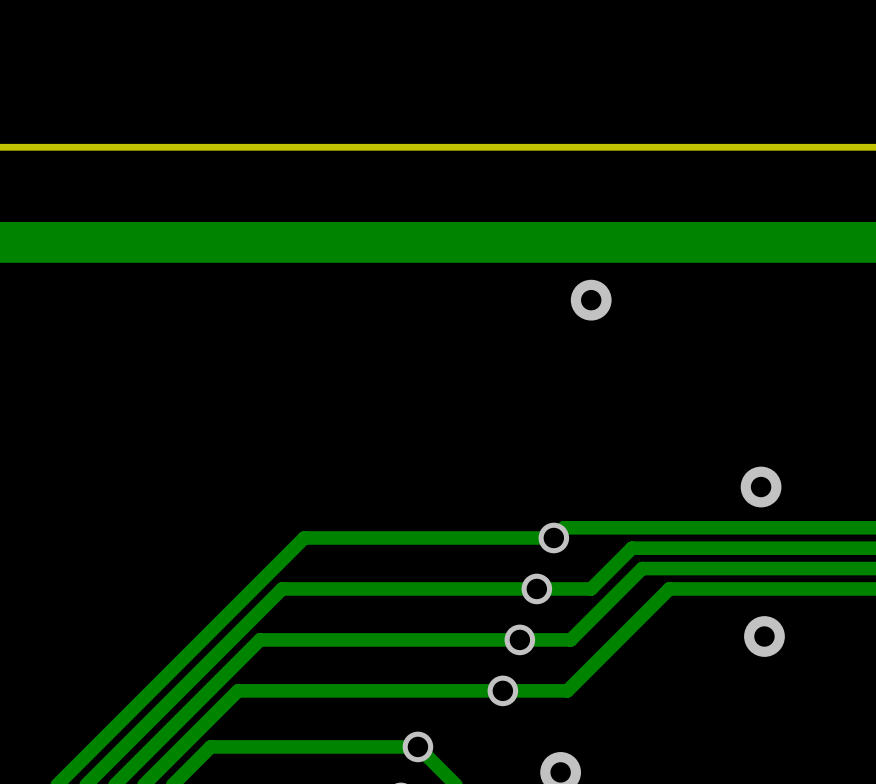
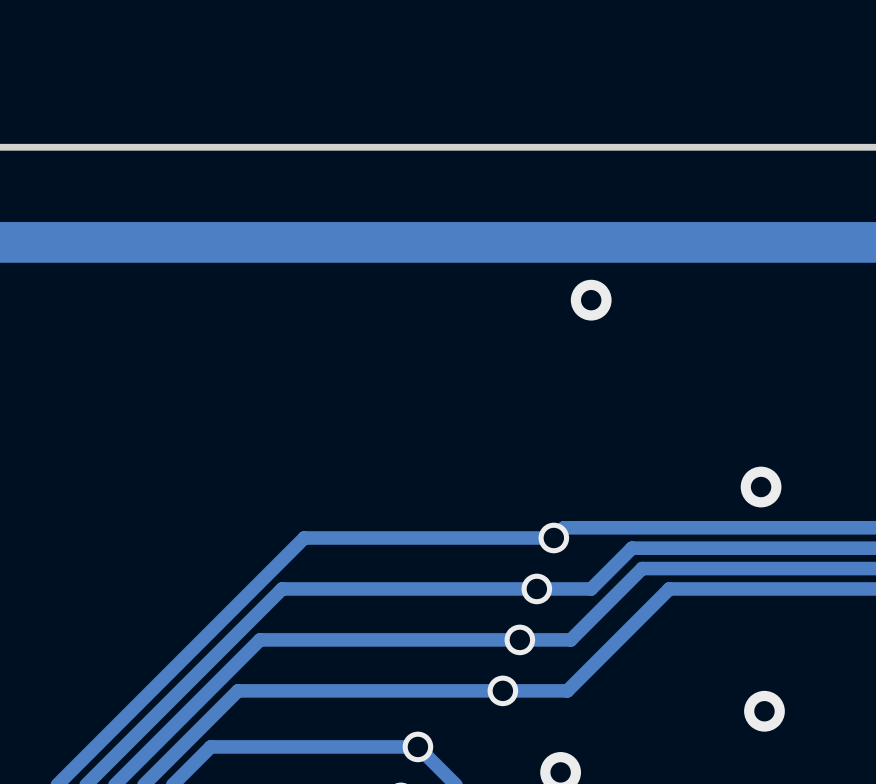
via: (764, 636) -> none
via: none -> (764, 711)

